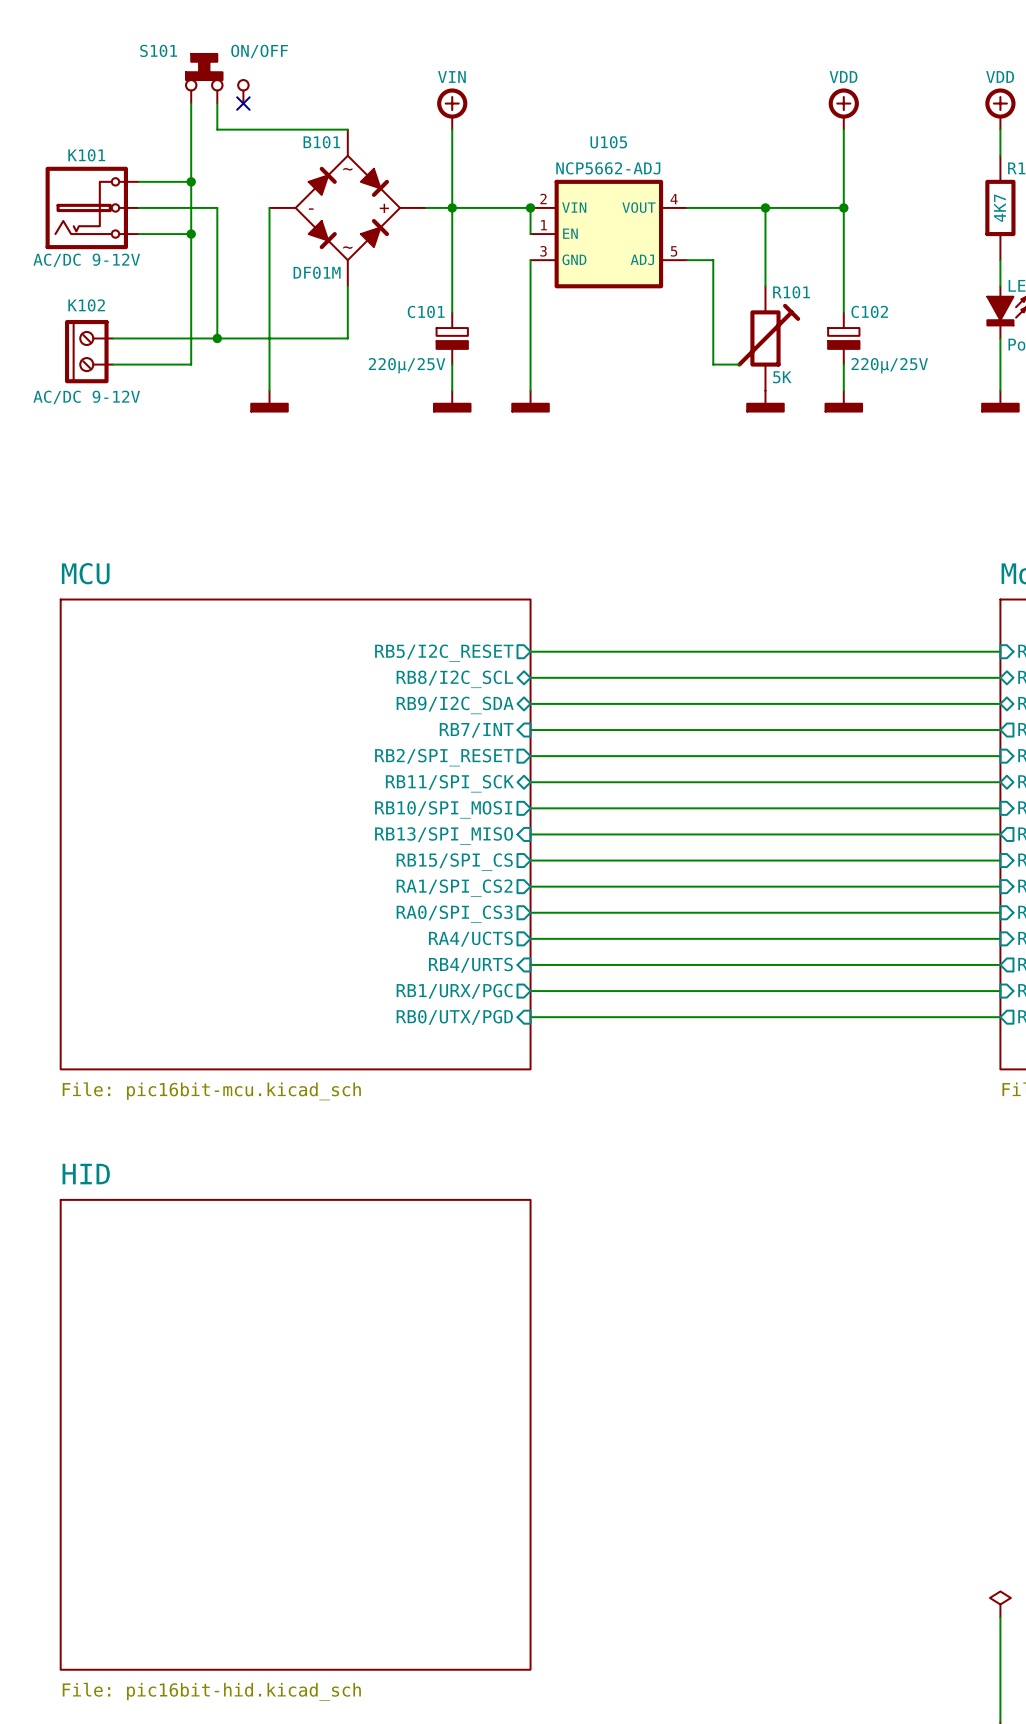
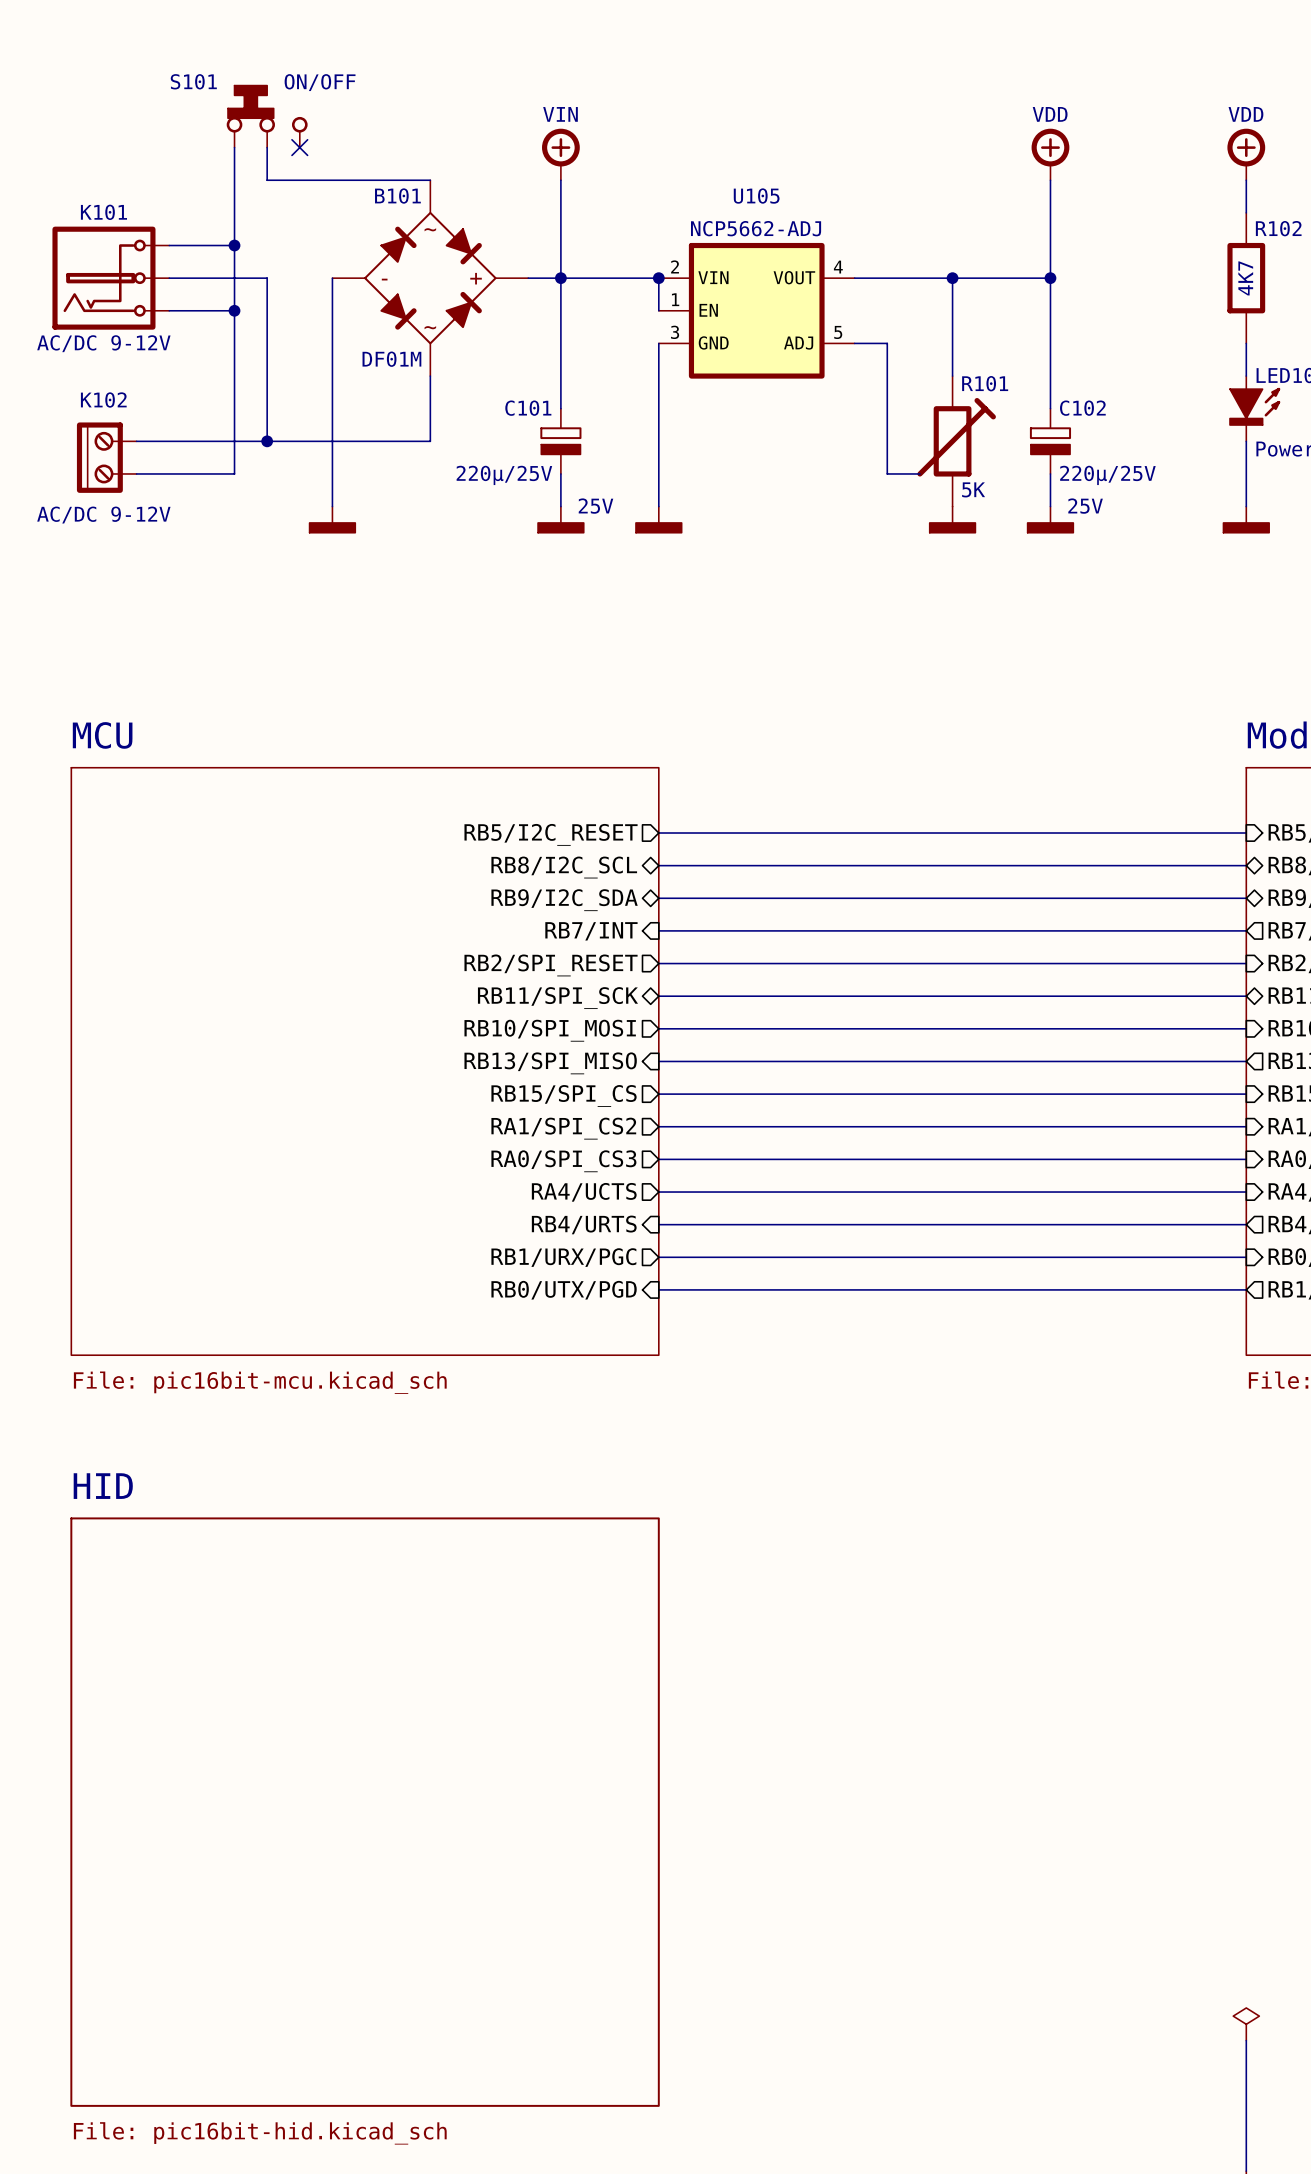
K102 symbol: [65, 319, 113, 384] -> [76, 422, 137, 493]
C101 text: none -> 25V (595, 506)
C102 text: none -> 25V (1085, 506)

